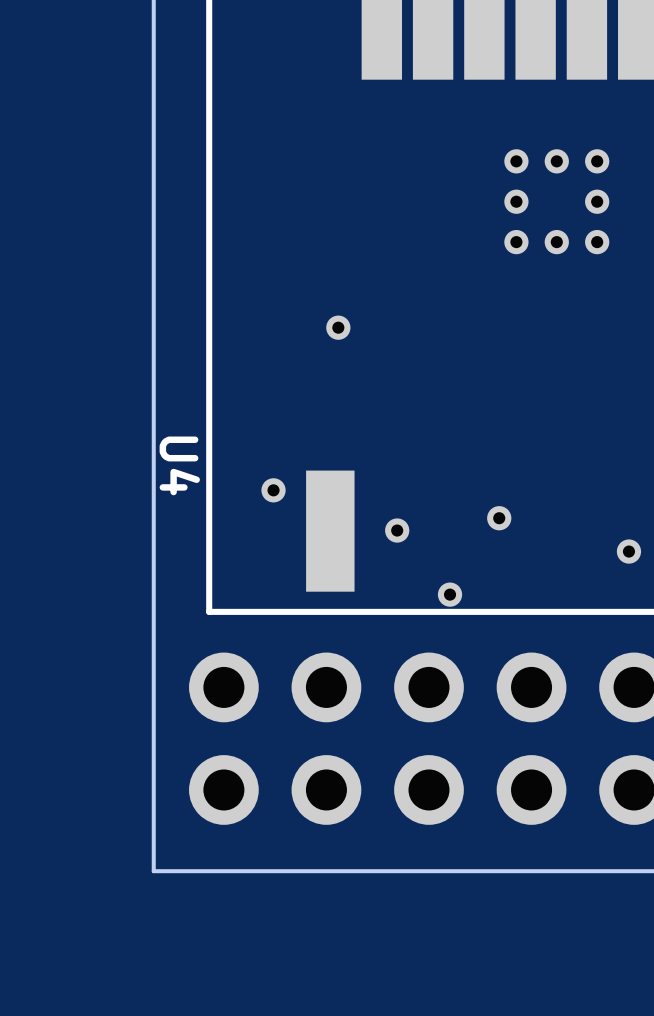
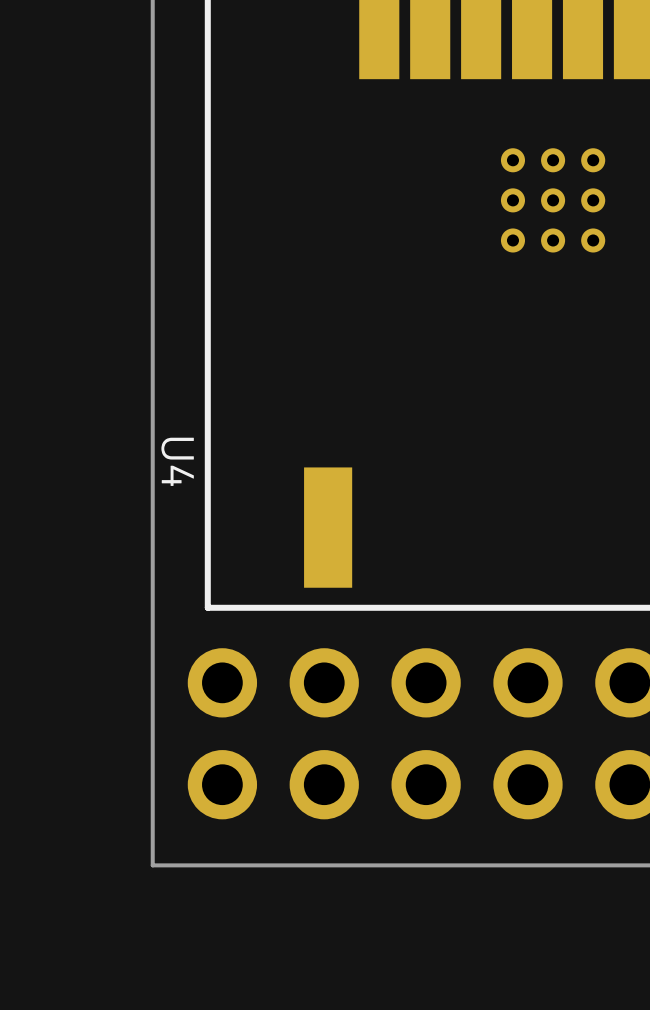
part: none -> (553, 200)
part: (338, 327) -> none
part: (273, 490) -> none
part: (499, 518) -> none
part: (397, 530) -> none
part: (628, 551) -> none
part: (450, 594) -> none

